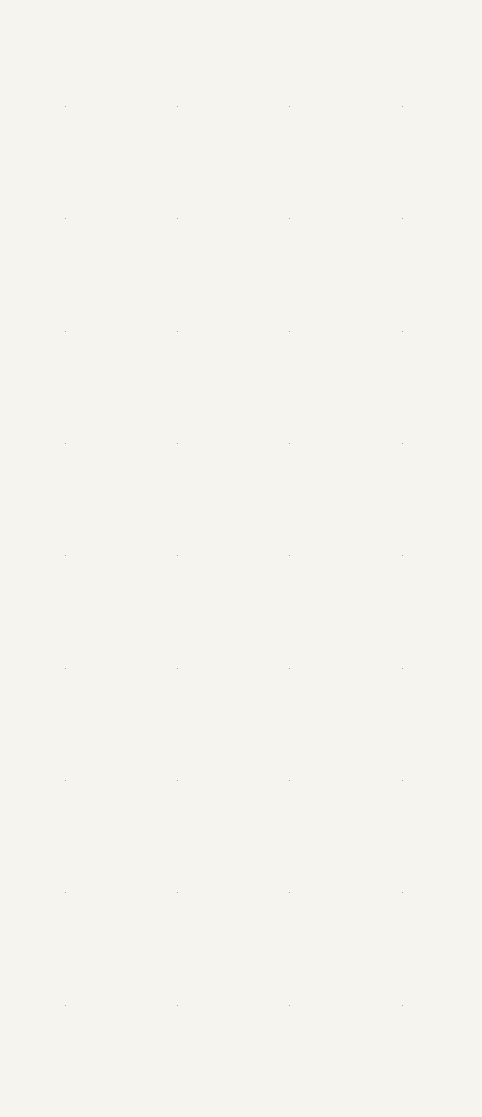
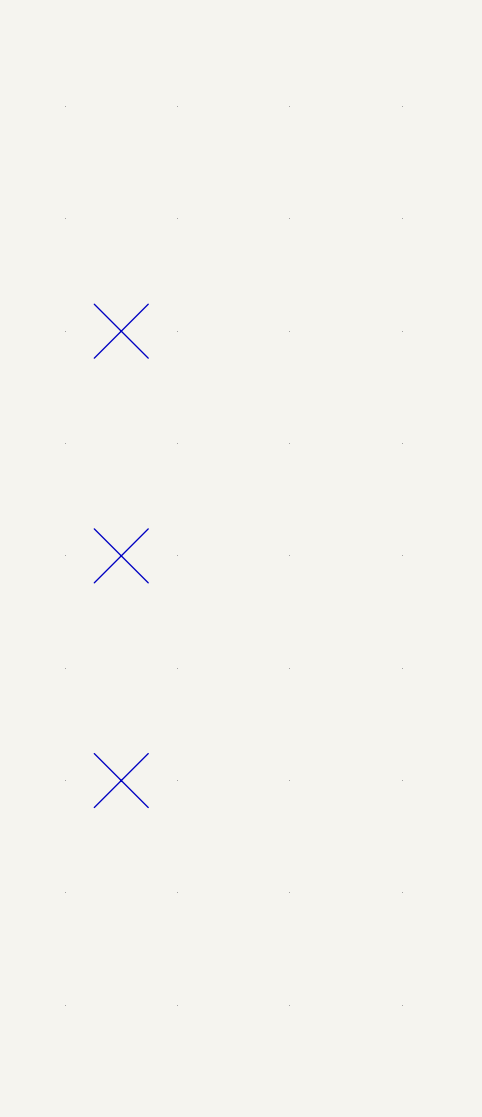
no-connect mark: none -> (121, 331)
no-connect mark: none -> (121, 555)
no-connect mark: none -> (121, 780)

